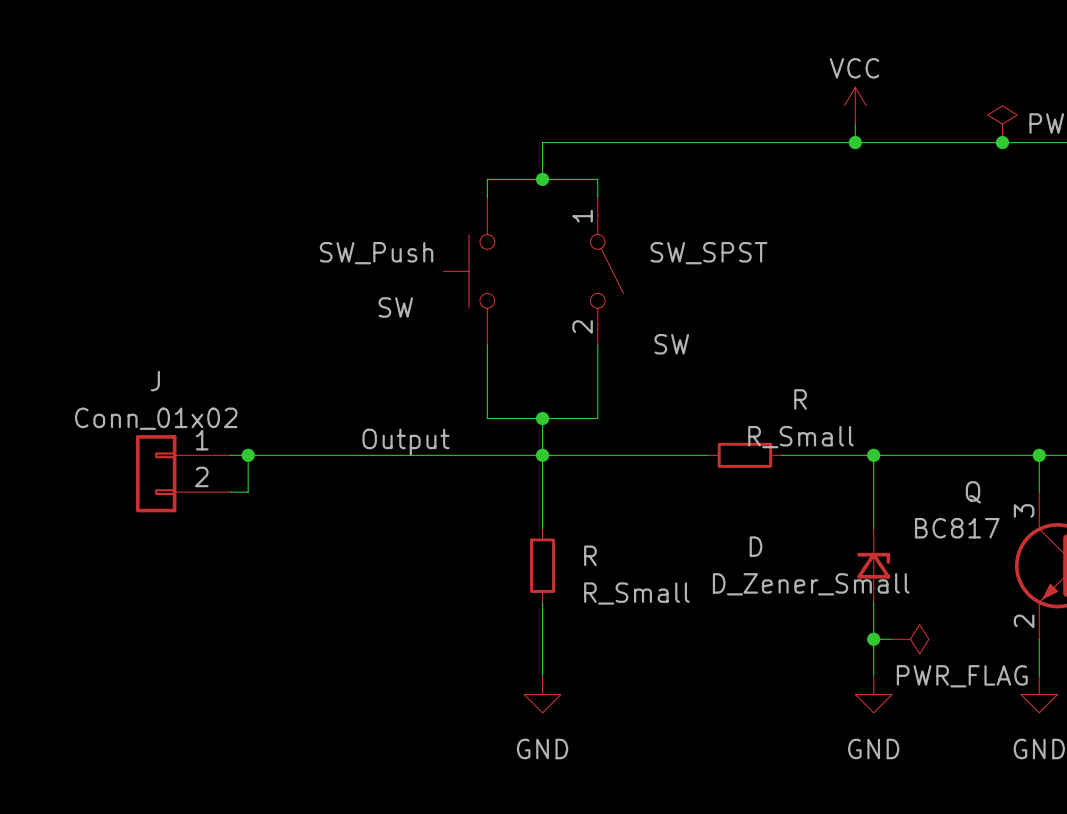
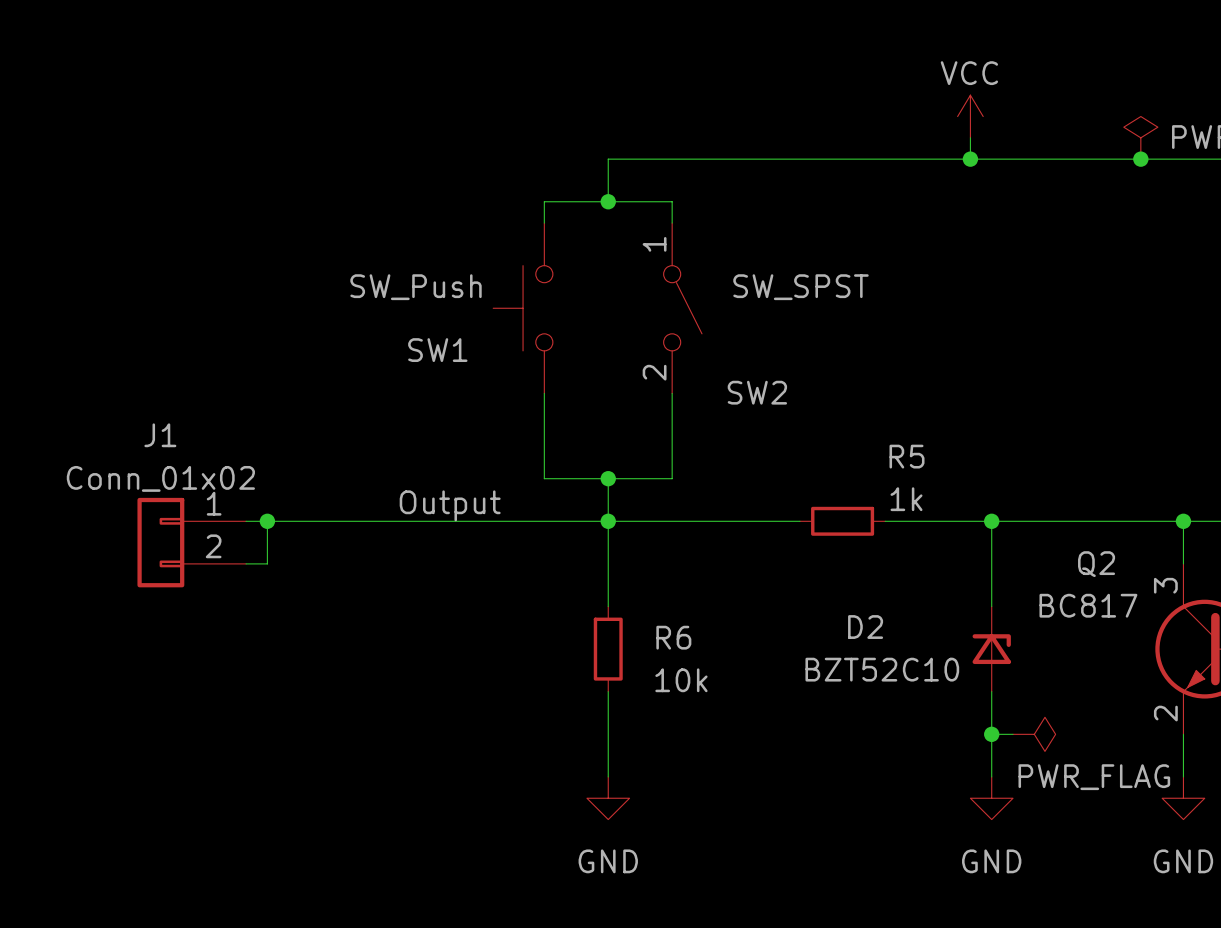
SW name: SW (395, 307) -> SW1 (437, 350)
SW name: SW (671, 344) -> SW2 (757, 392)
J name: J (155, 381) -> J1 (160, 435)
R name: R (800, 399) -> R5 (907, 456)
R value: R_Small (800, 437) -> 1k (906, 499)
Q name: Q (973, 492) -> Q2 (1096, 564)
D name: D (756, 546) -> D2 (865, 627)
R name: R (590, 555) -> R6 (673, 637)
D value: D_Zener_Small (811, 584) -> BZT52C10 (882, 669)
R value: R_Small (636, 593) -> 10k (681, 680)

